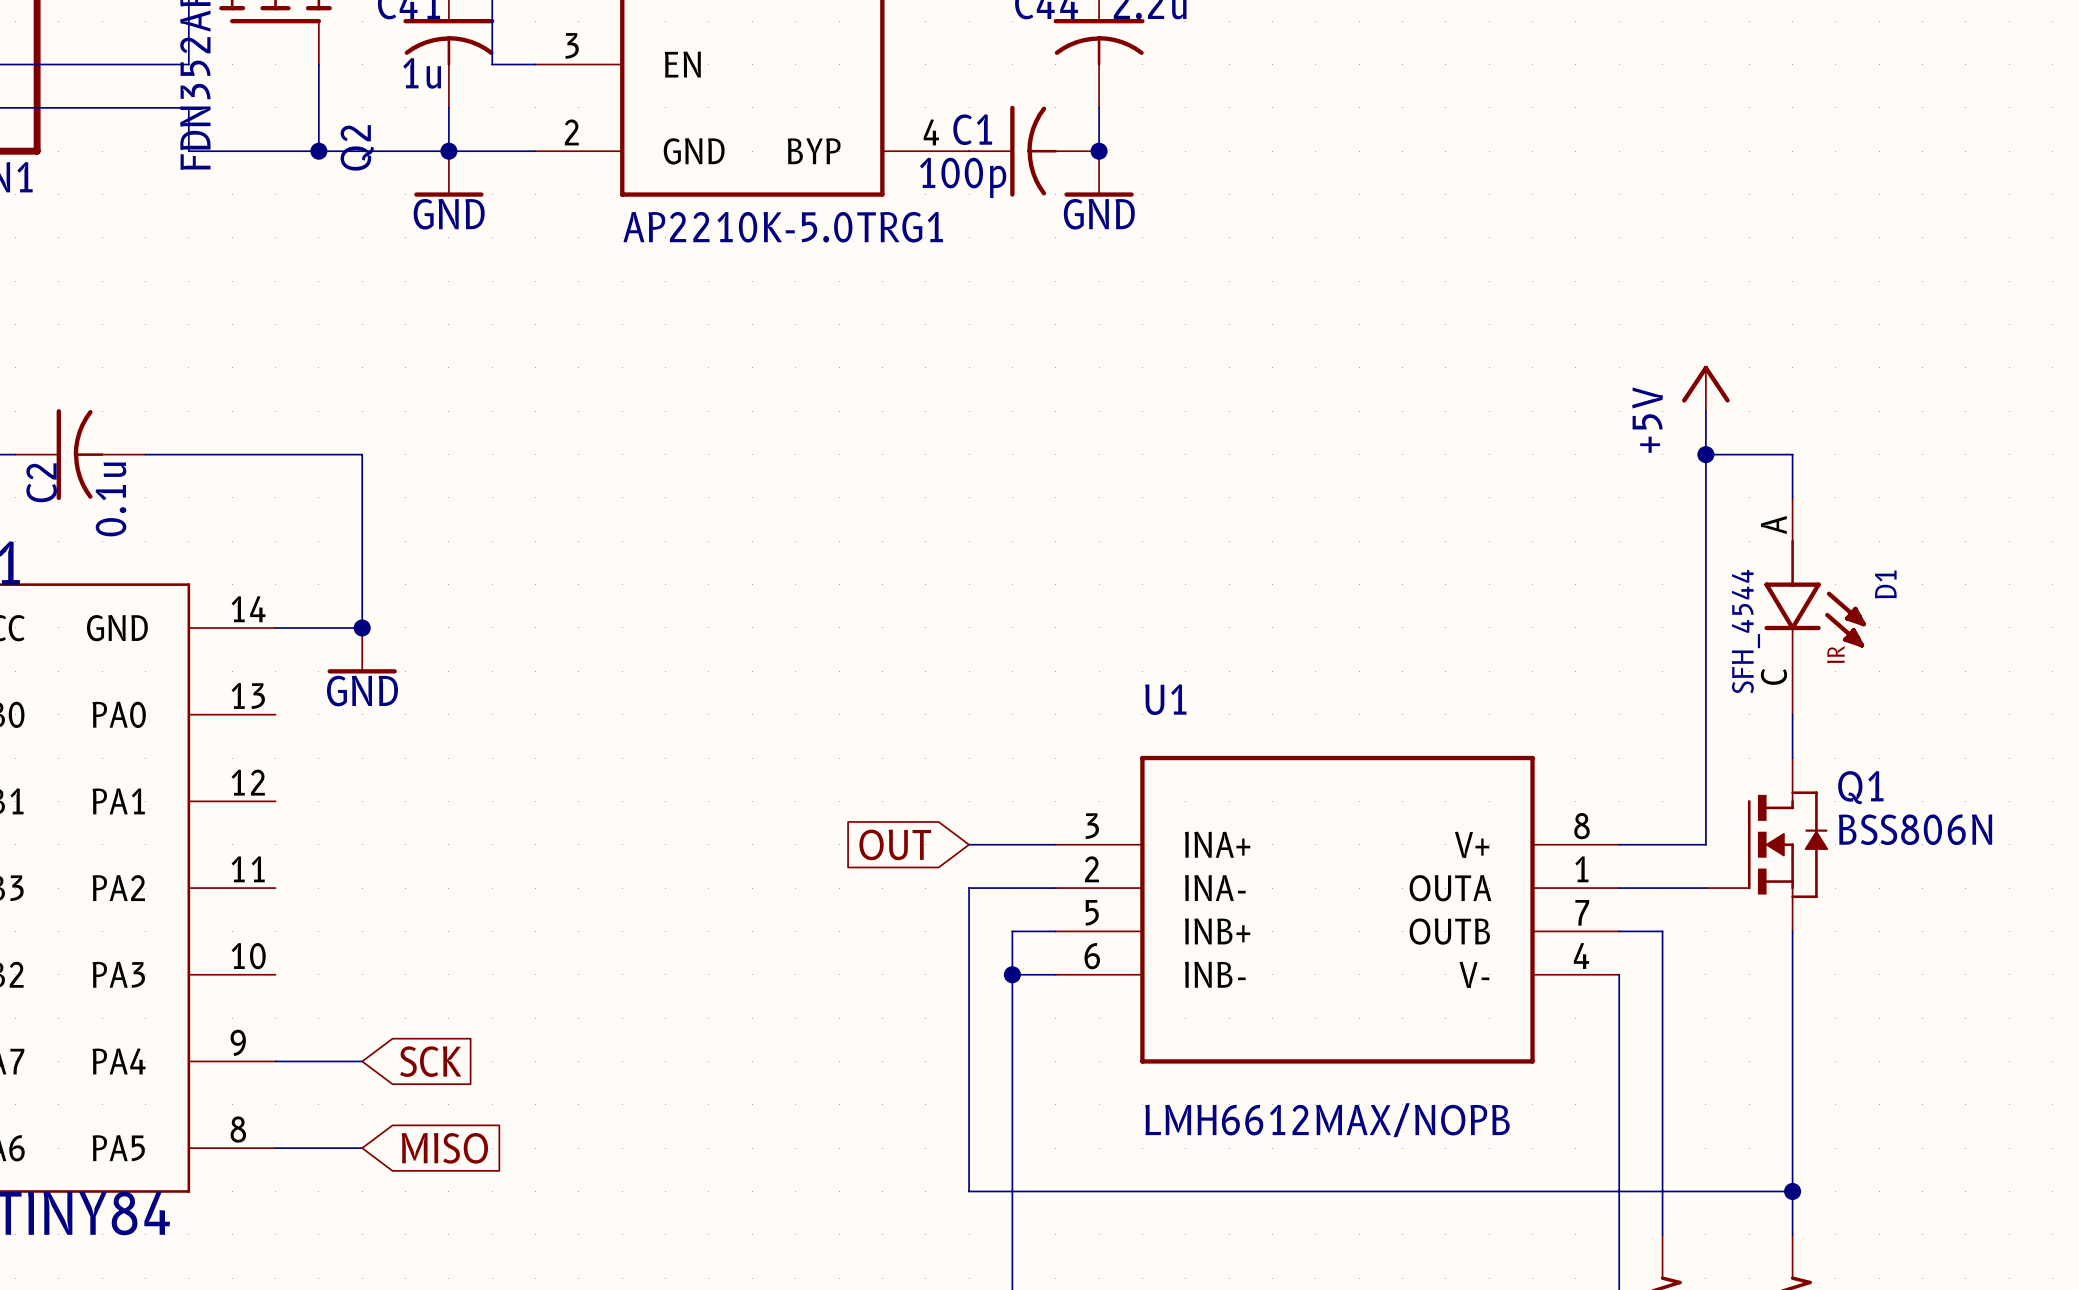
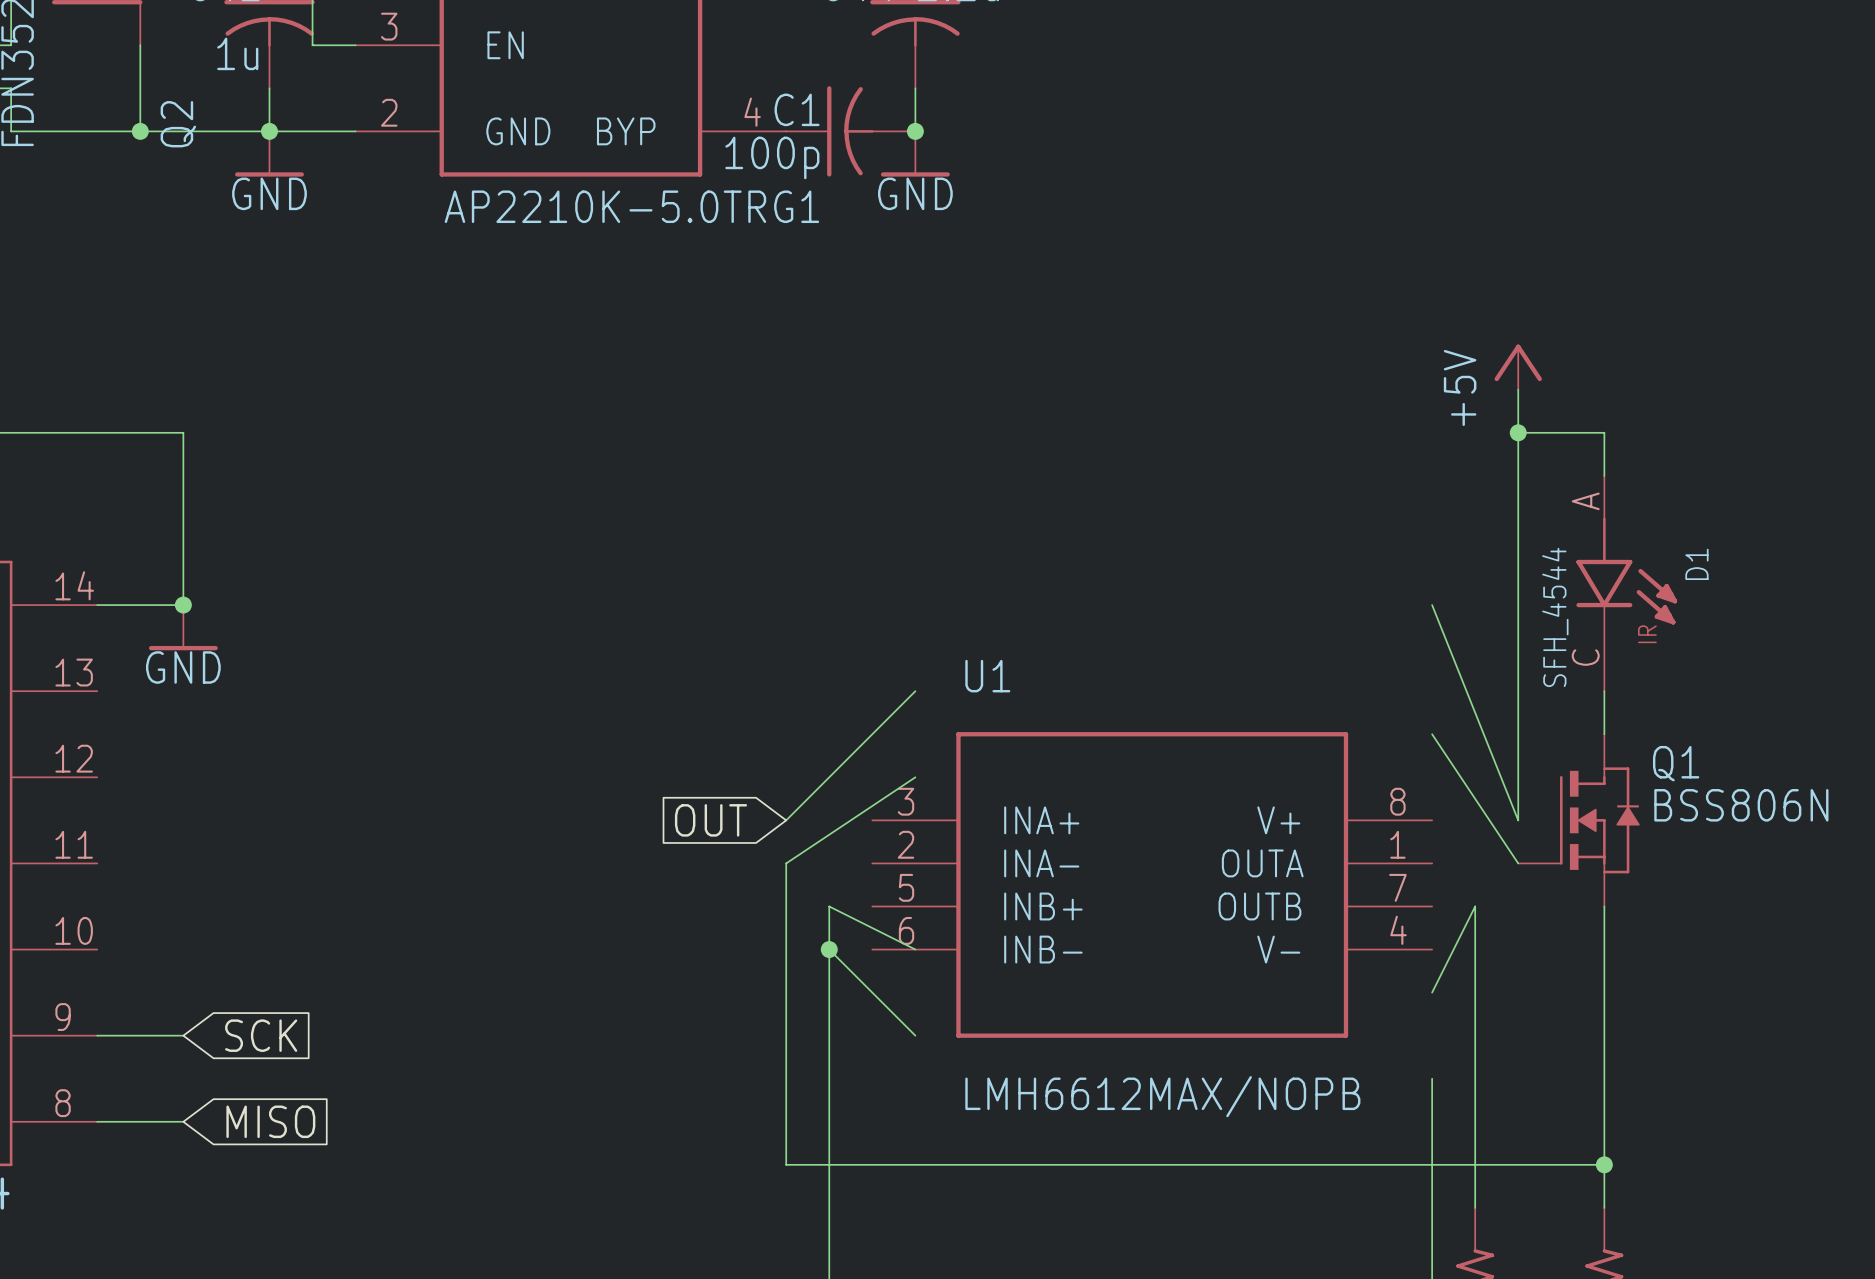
wire: (969, 844) (1055, 844) -> (786, 820) (915, 691)
wire: (1619, 844) (1705, 844) -> (1432, 605) (1518, 820)
wire: (969, 888) (1055, 888) -> (786, 863) (915, 777)
wire: (1619, 888) (1705, 888) -> (1432, 734) (1518, 863)
wire: (1012, 931) (1055, 931) -> (829, 906) (915, 949)
wire: (1619, 931) (1662, 931) -> (1432, 992) (1475, 906)
wire: (1012, 974) (1055, 974) -> (829, 949) (915, 1035)
wire: (1619, 974) (1619, 1104) -> none

